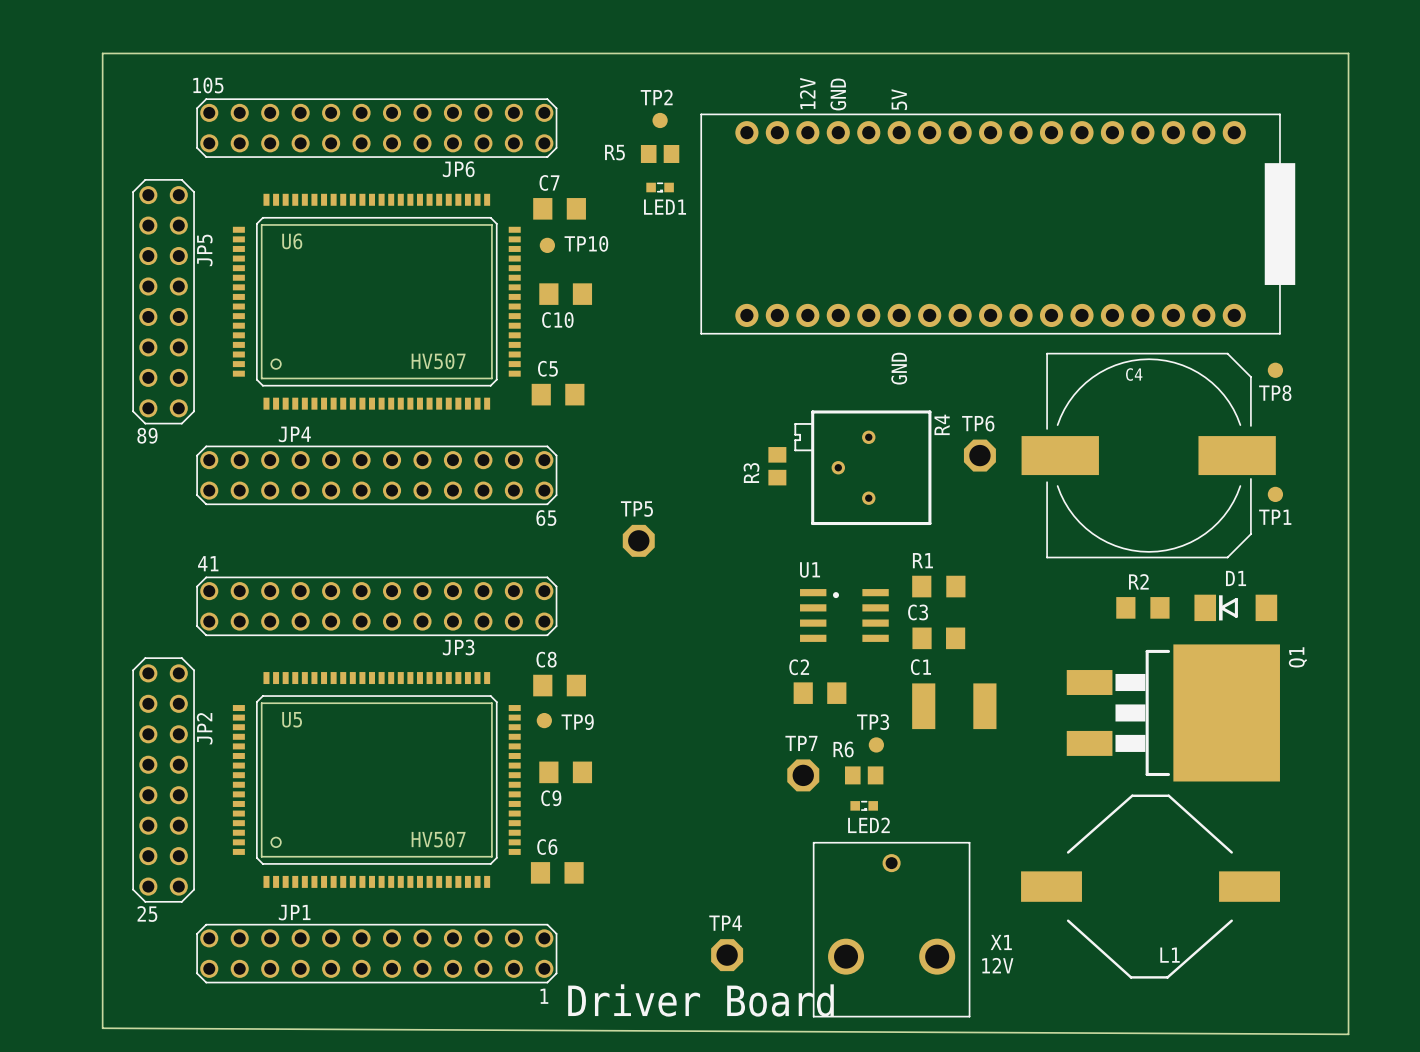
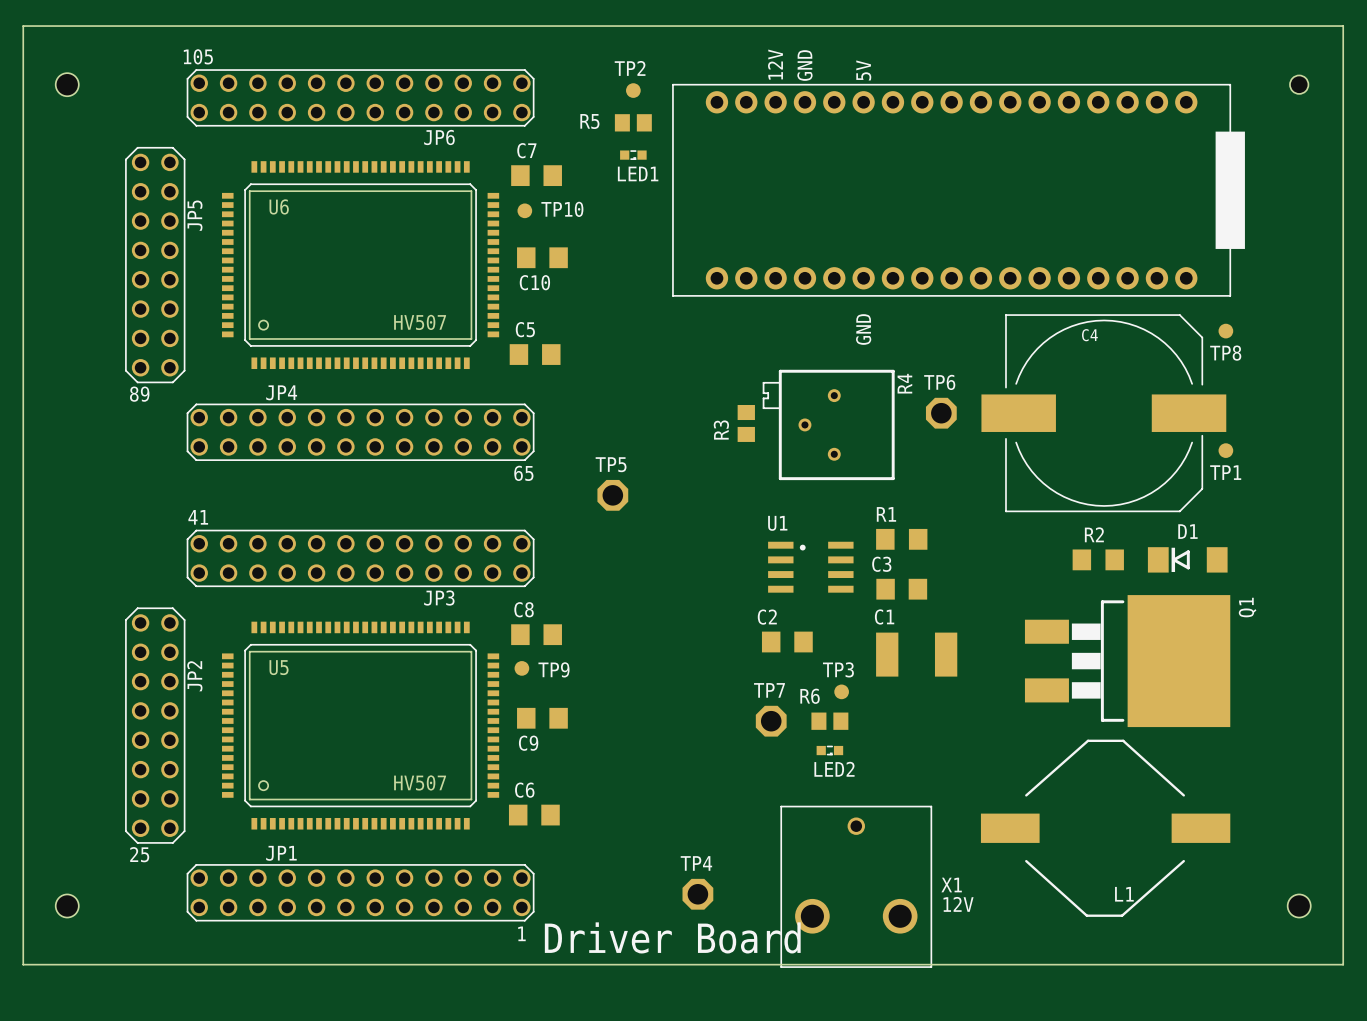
board edge: (102, 53) (102, 1028) (1348, 1034) (1348, 53) -> (96, 26) (23, 26) (23, 964) (1343, 964) (1343, 26) (1296, 26)
hole: none -> (67, 84)
hole: none -> (1299, 84)
X1 footprint: [812, 841, 971, 1018] -> [780, 805, 933, 968]
hole: none -> (67, 905)
hole: none -> (1299, 905)

